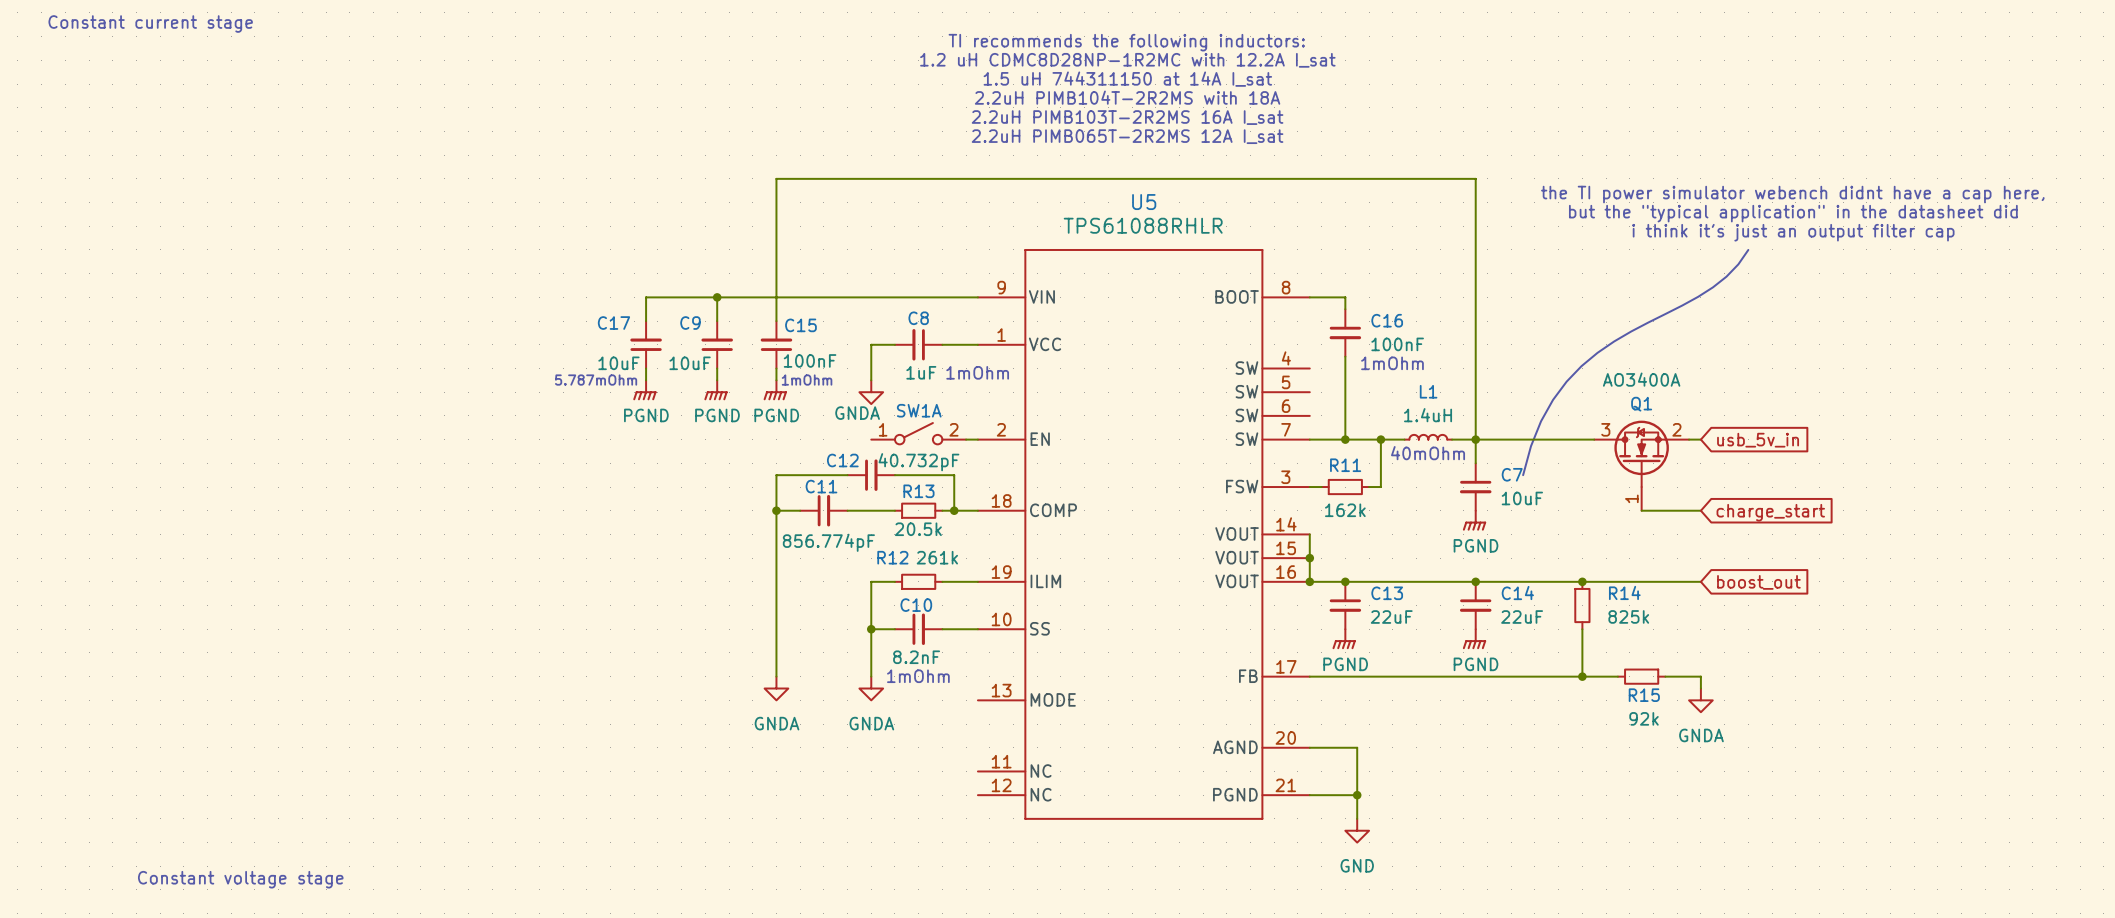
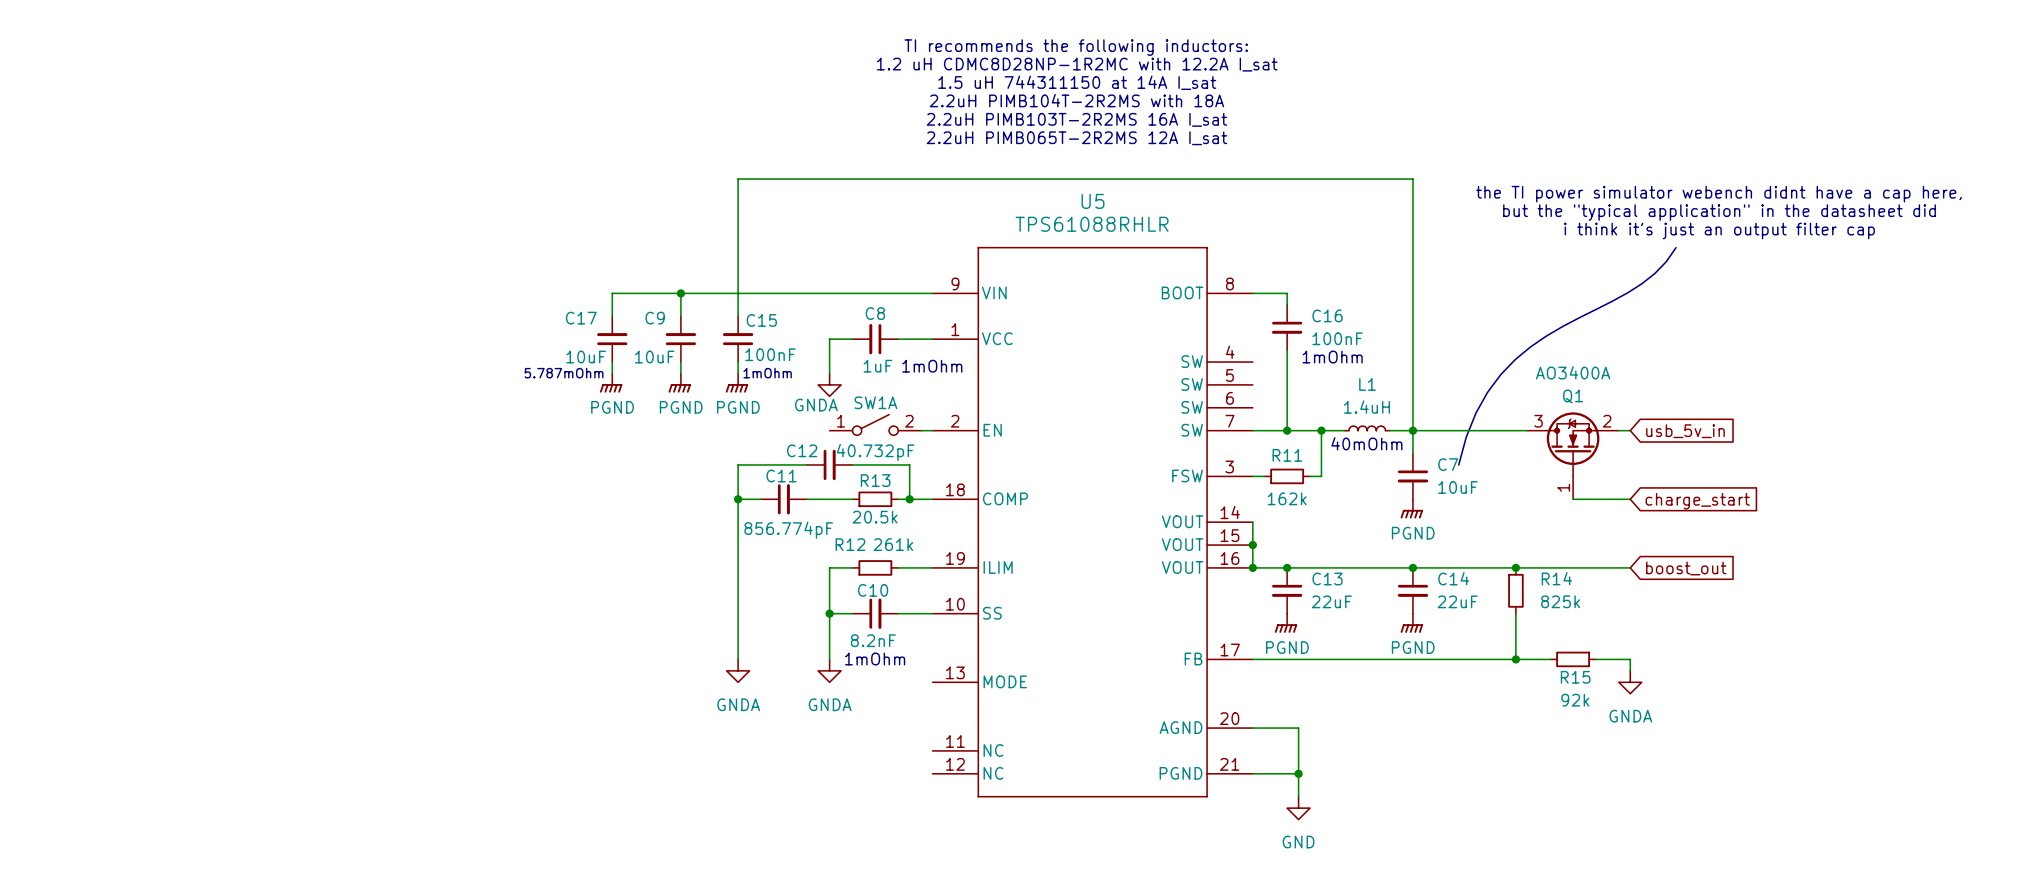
text: Constant current stage (150, 23) -> none
text: Constant voltage stage (240, 879) -> none

